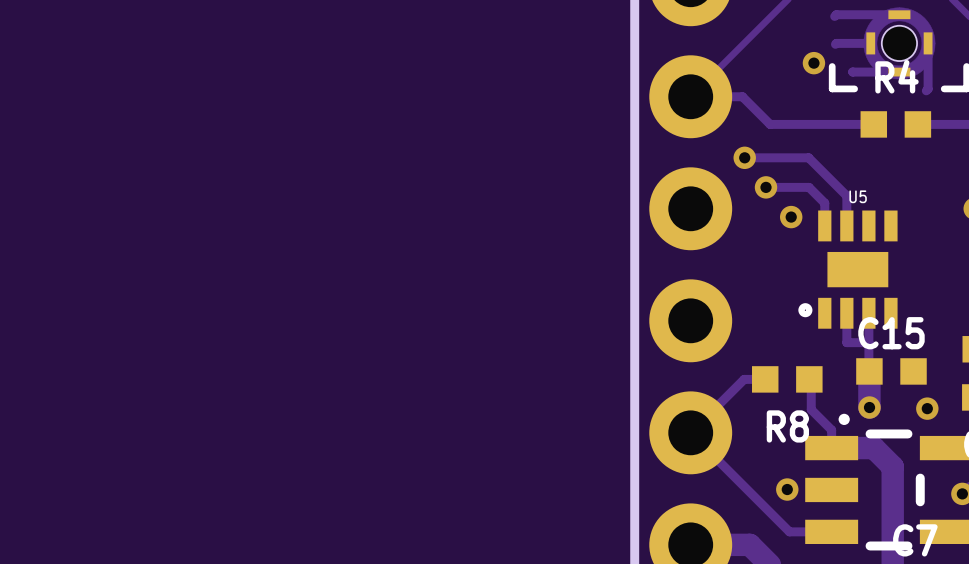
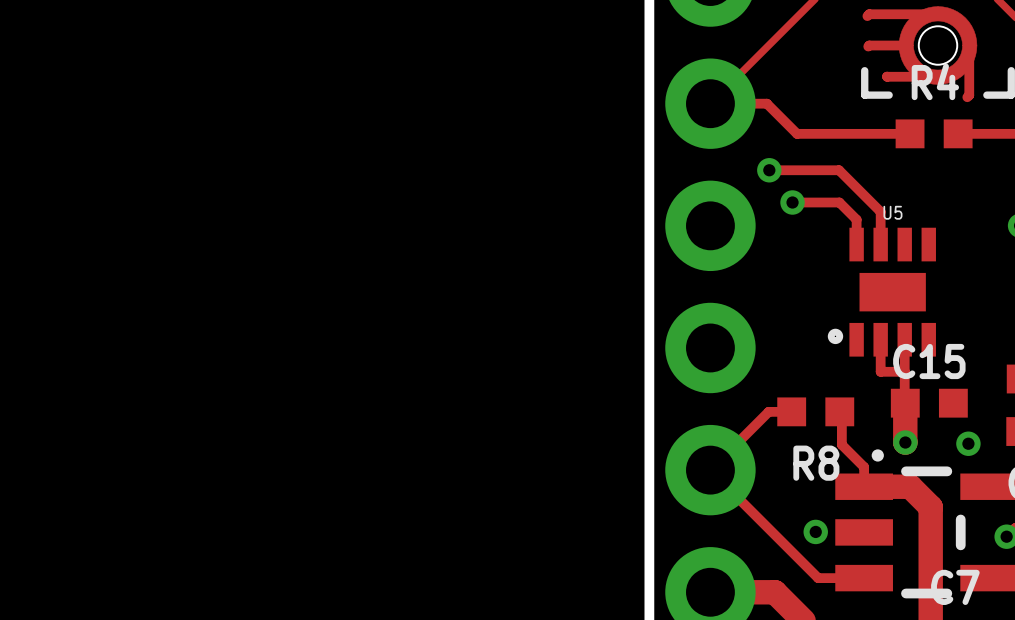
via: (813, 63) -> none
via: (791, 217) -> none

